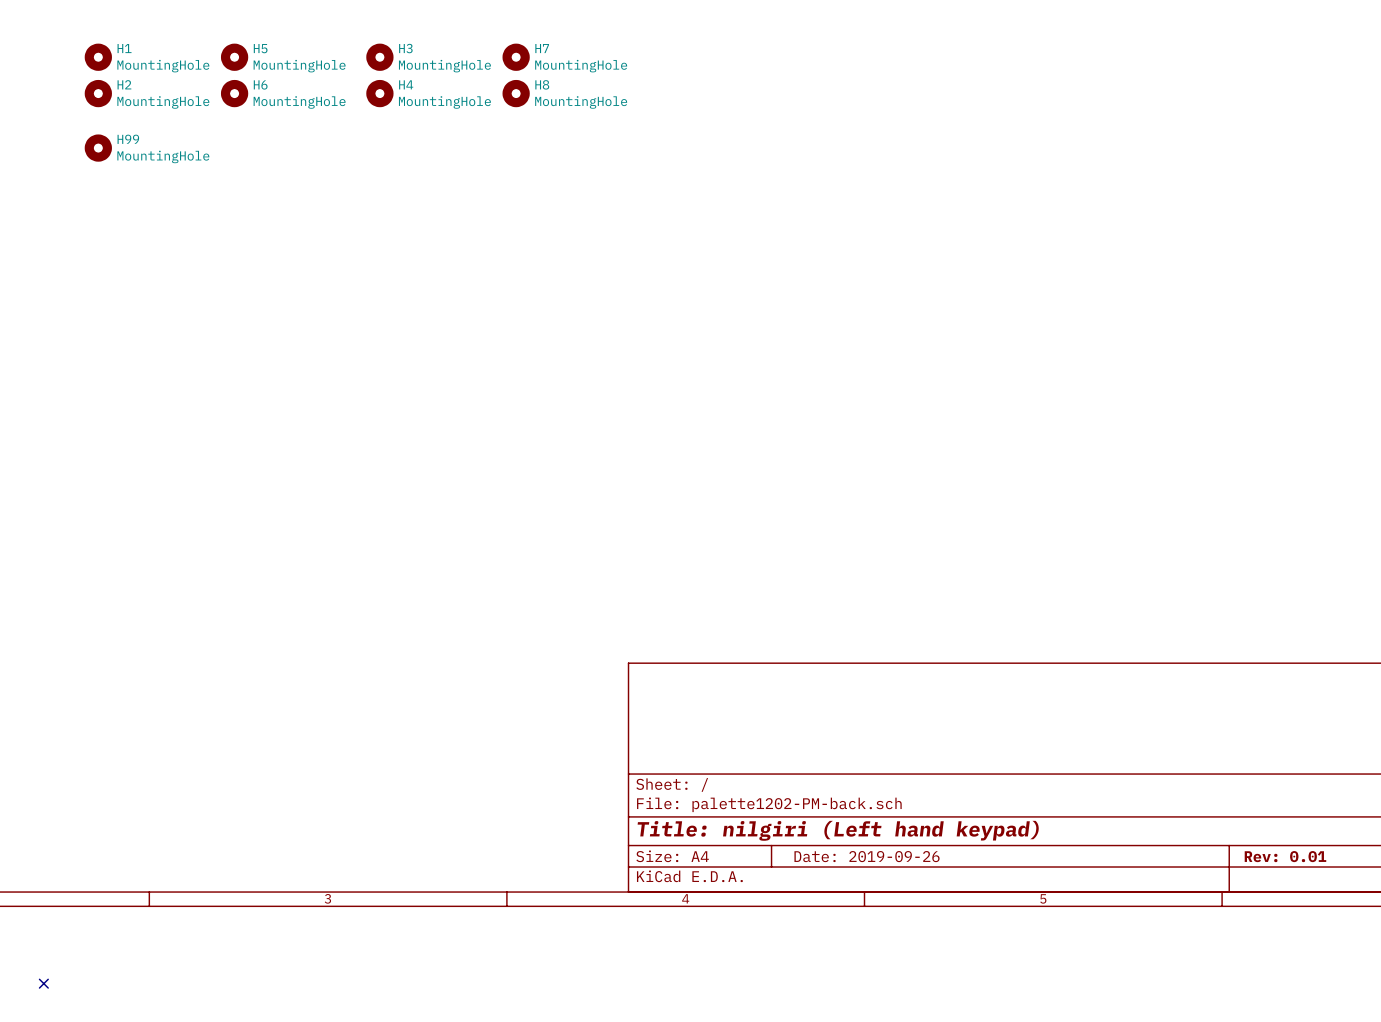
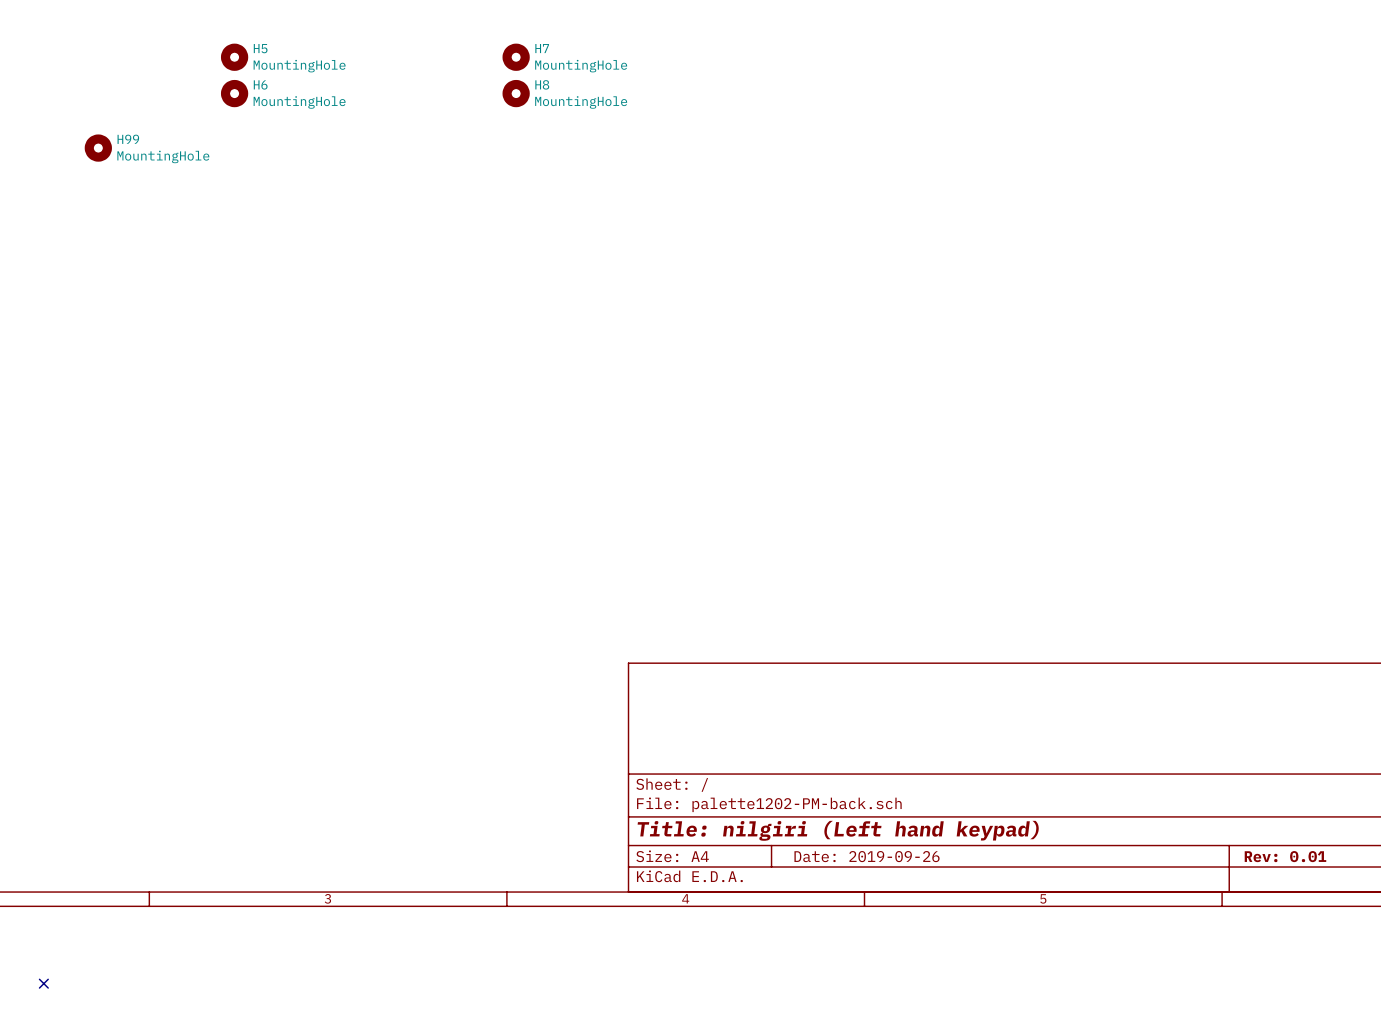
H1: MountingHole (98, 57) -> none
H3: MountingHole (379, 57) -> none
H2: MountingHole (98, 93) -> none
H4: MountingHole (379, 93) -> none

